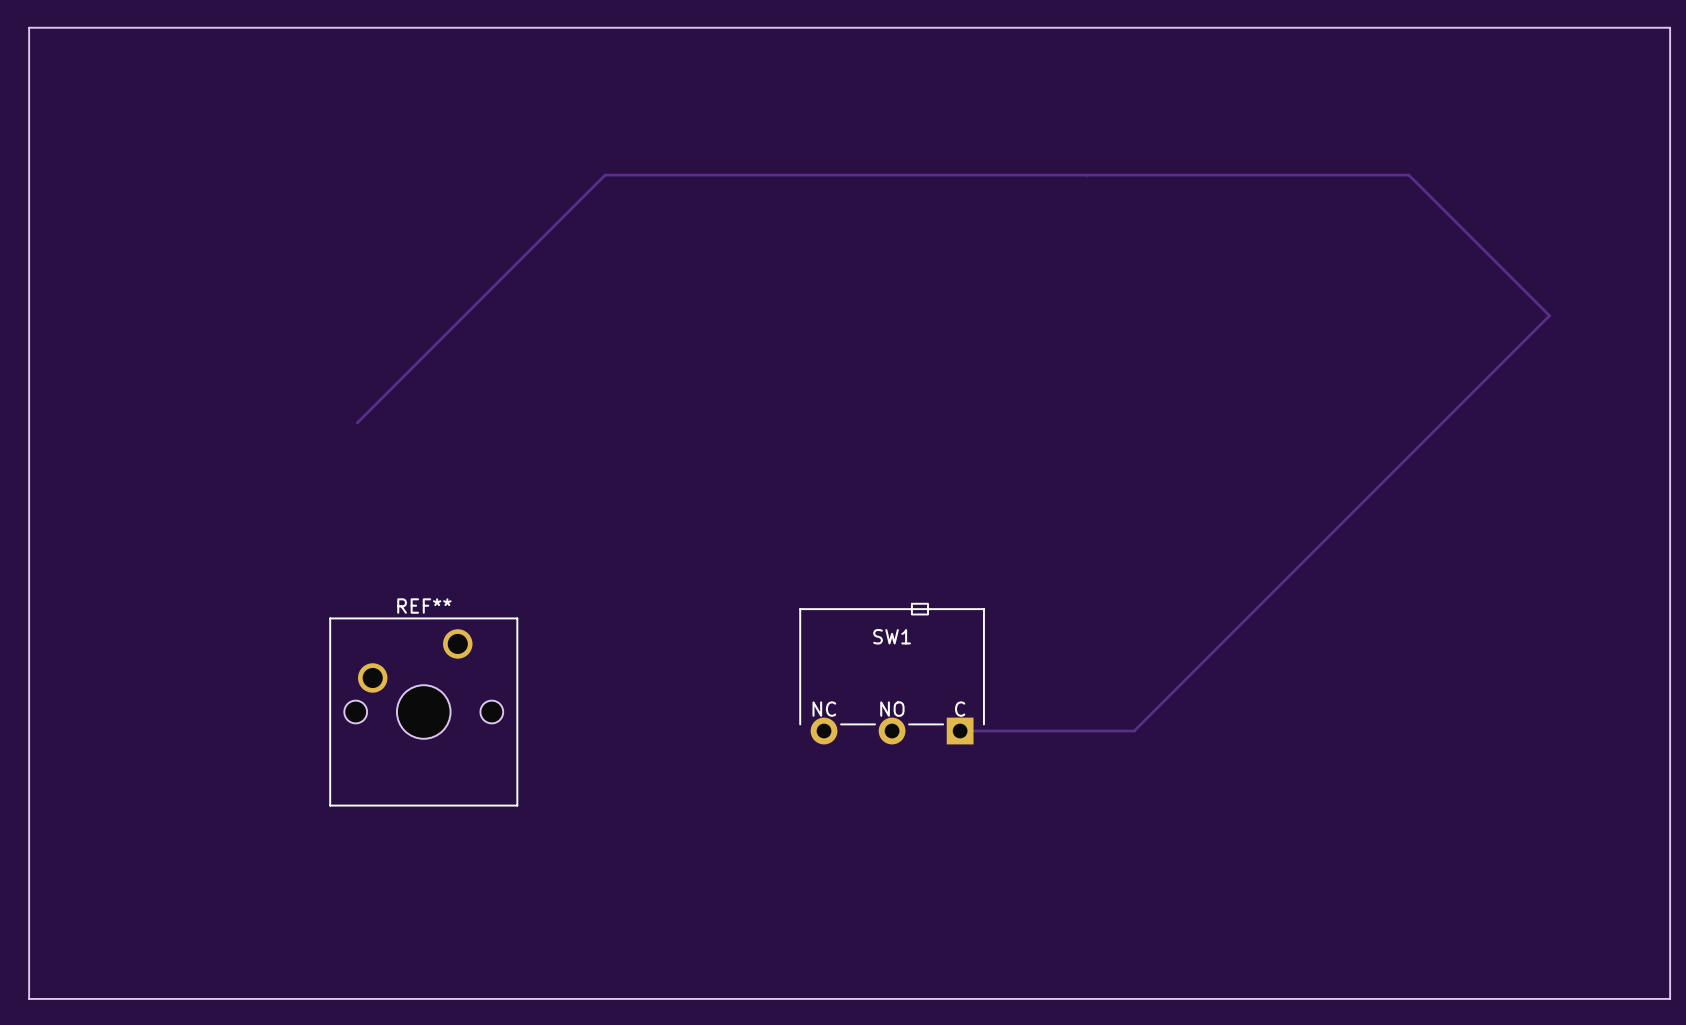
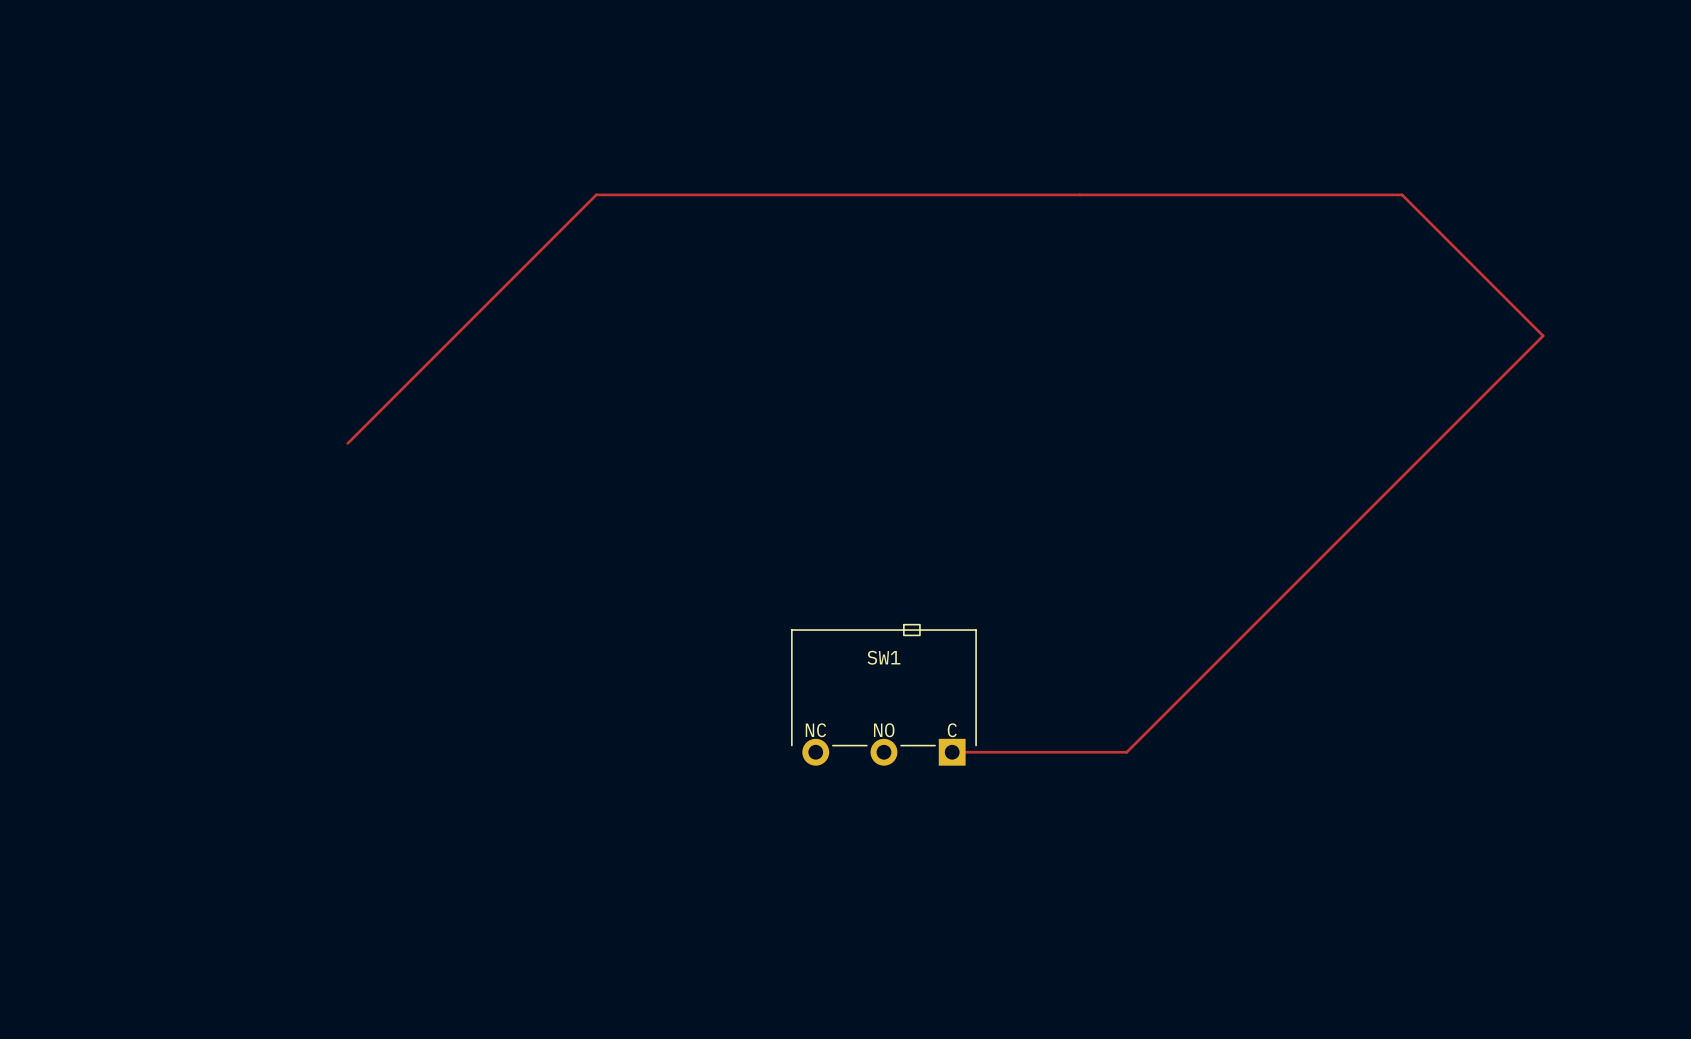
board edge: (29, 27) (1670, 27) (1670, 998) (29, 998) (29, 27) -> none
REF**: (423, 712) -> none

